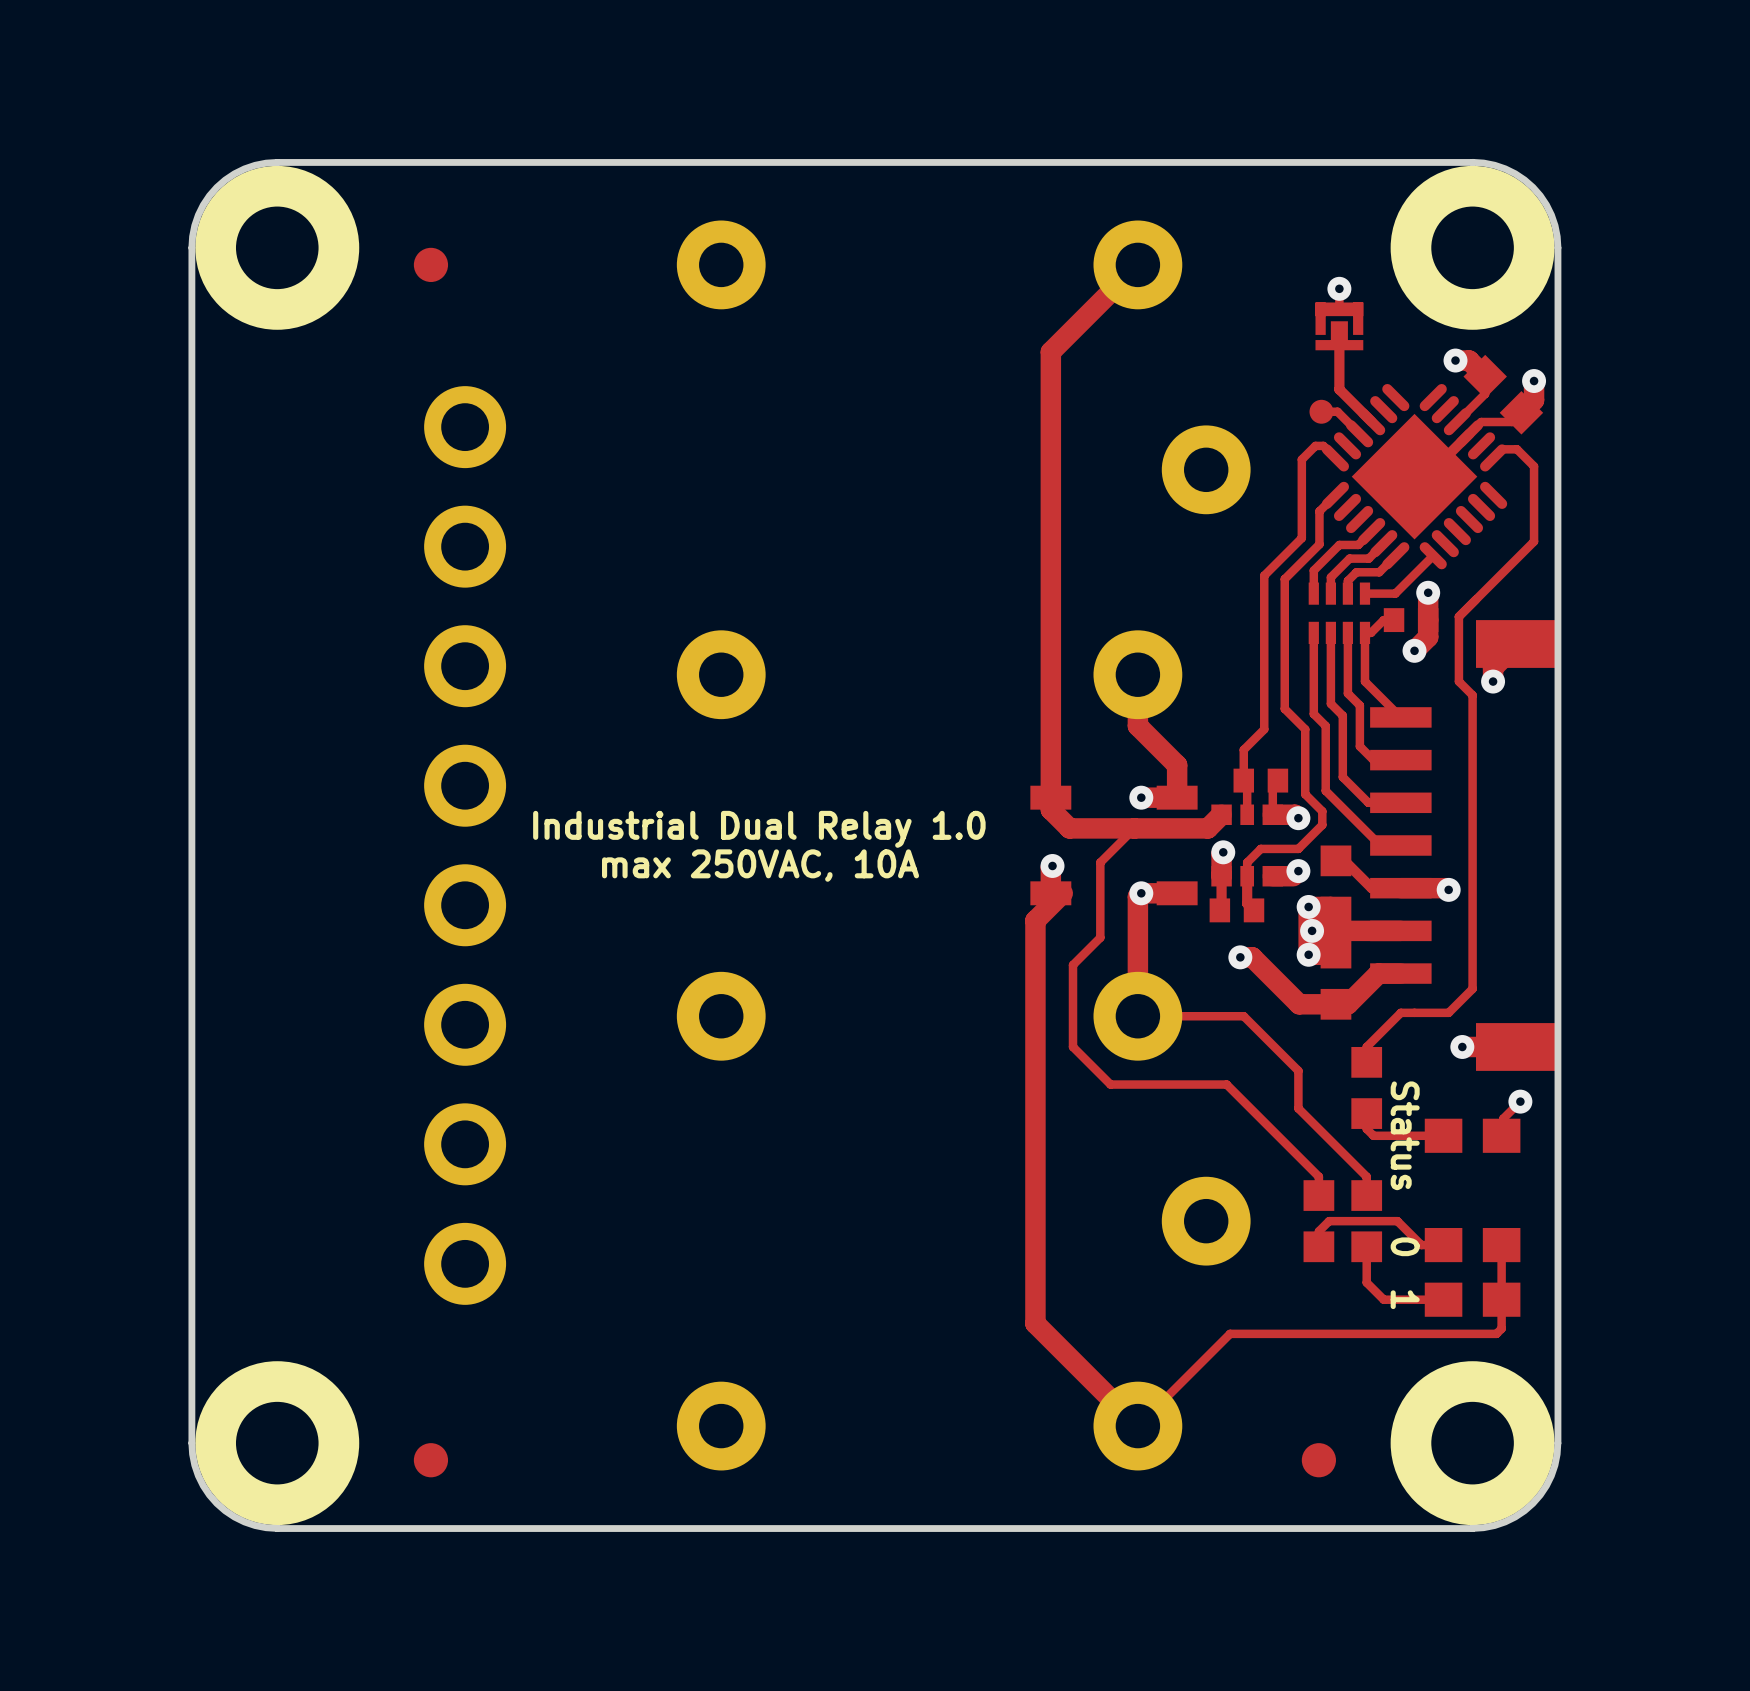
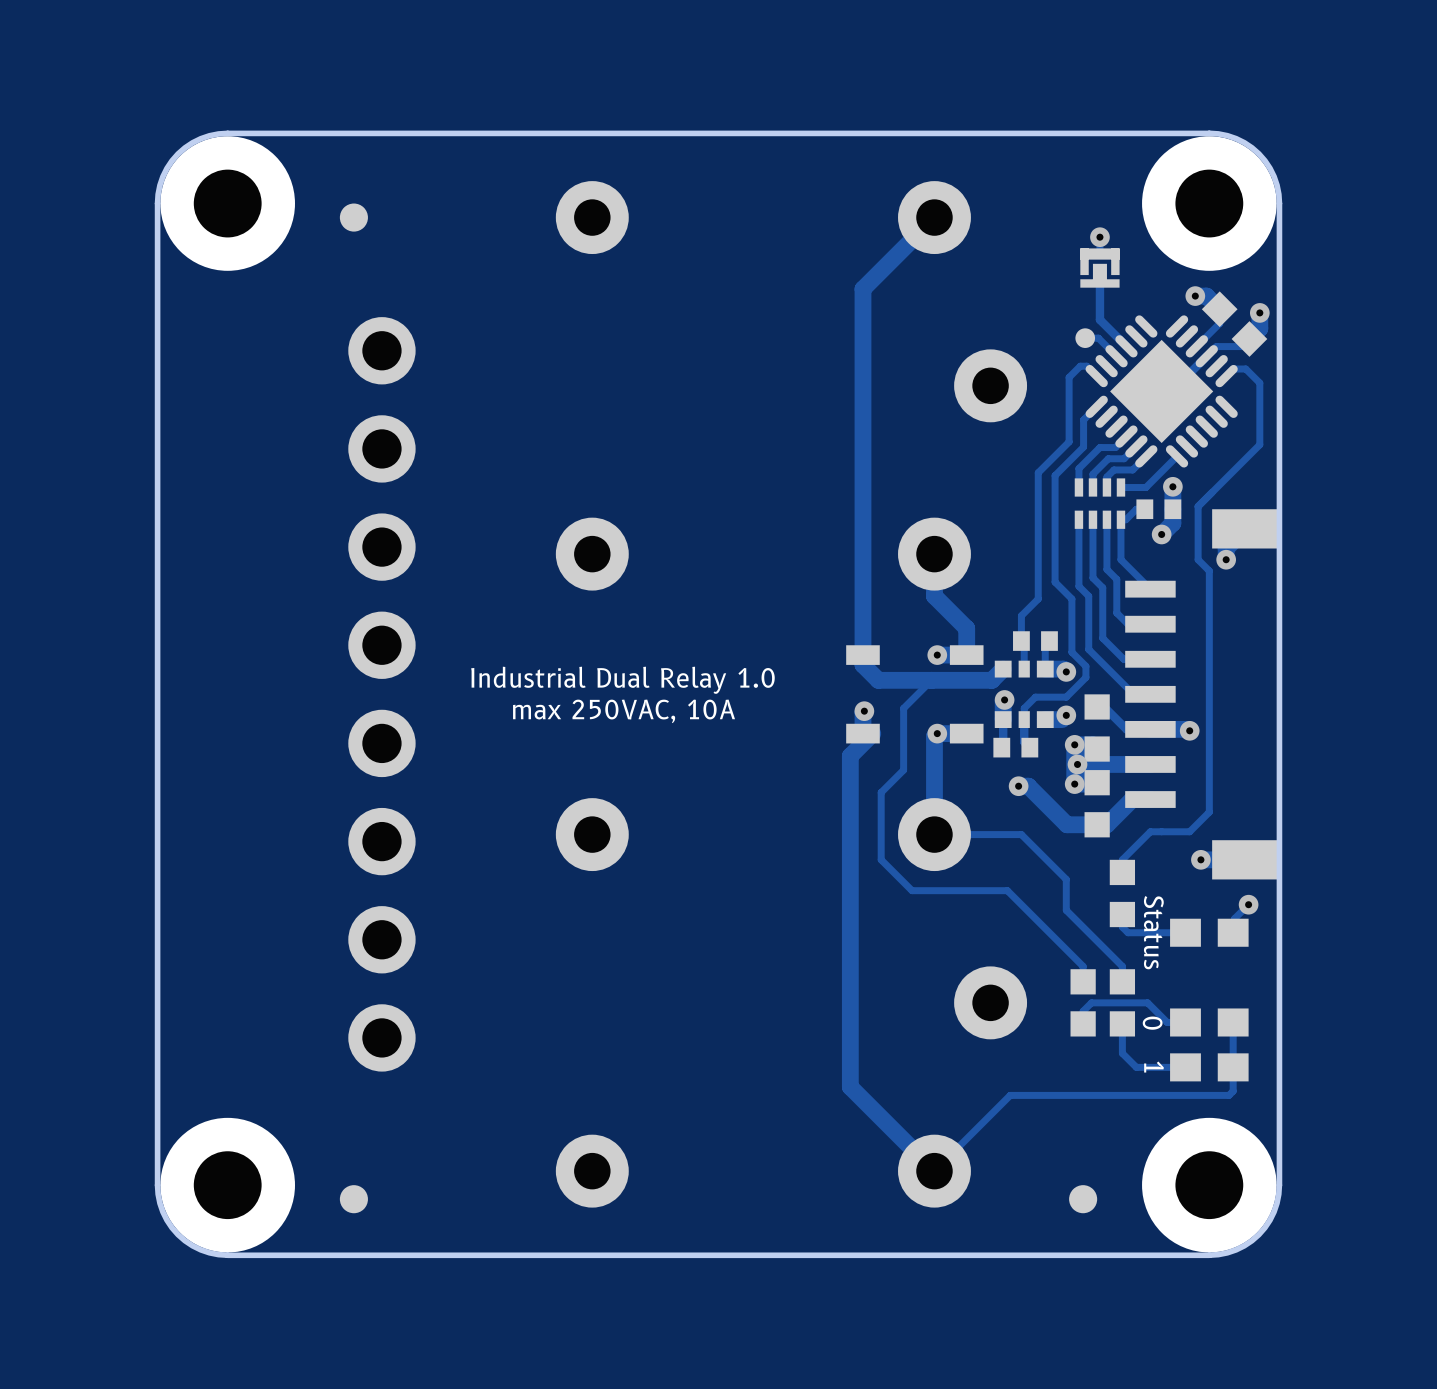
text rotation: 0° (1405, 1246) -> 180° (1152, 1023)

